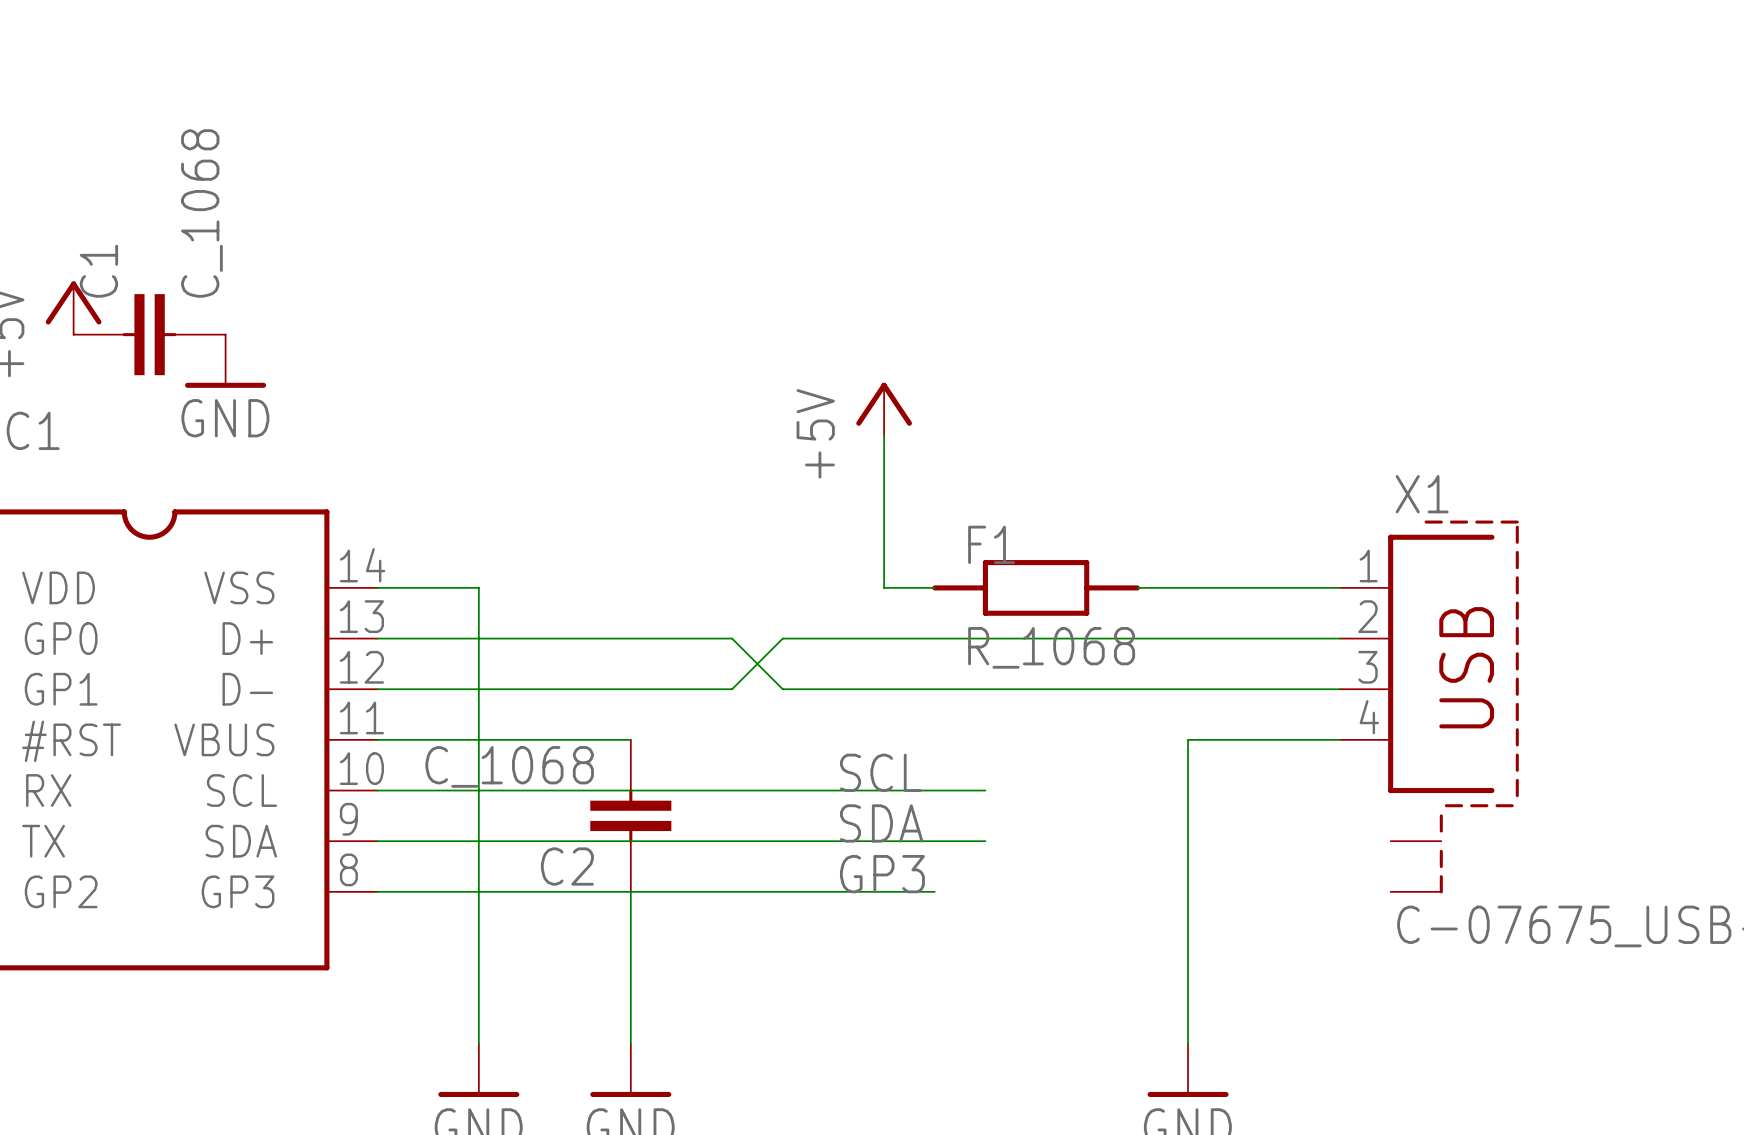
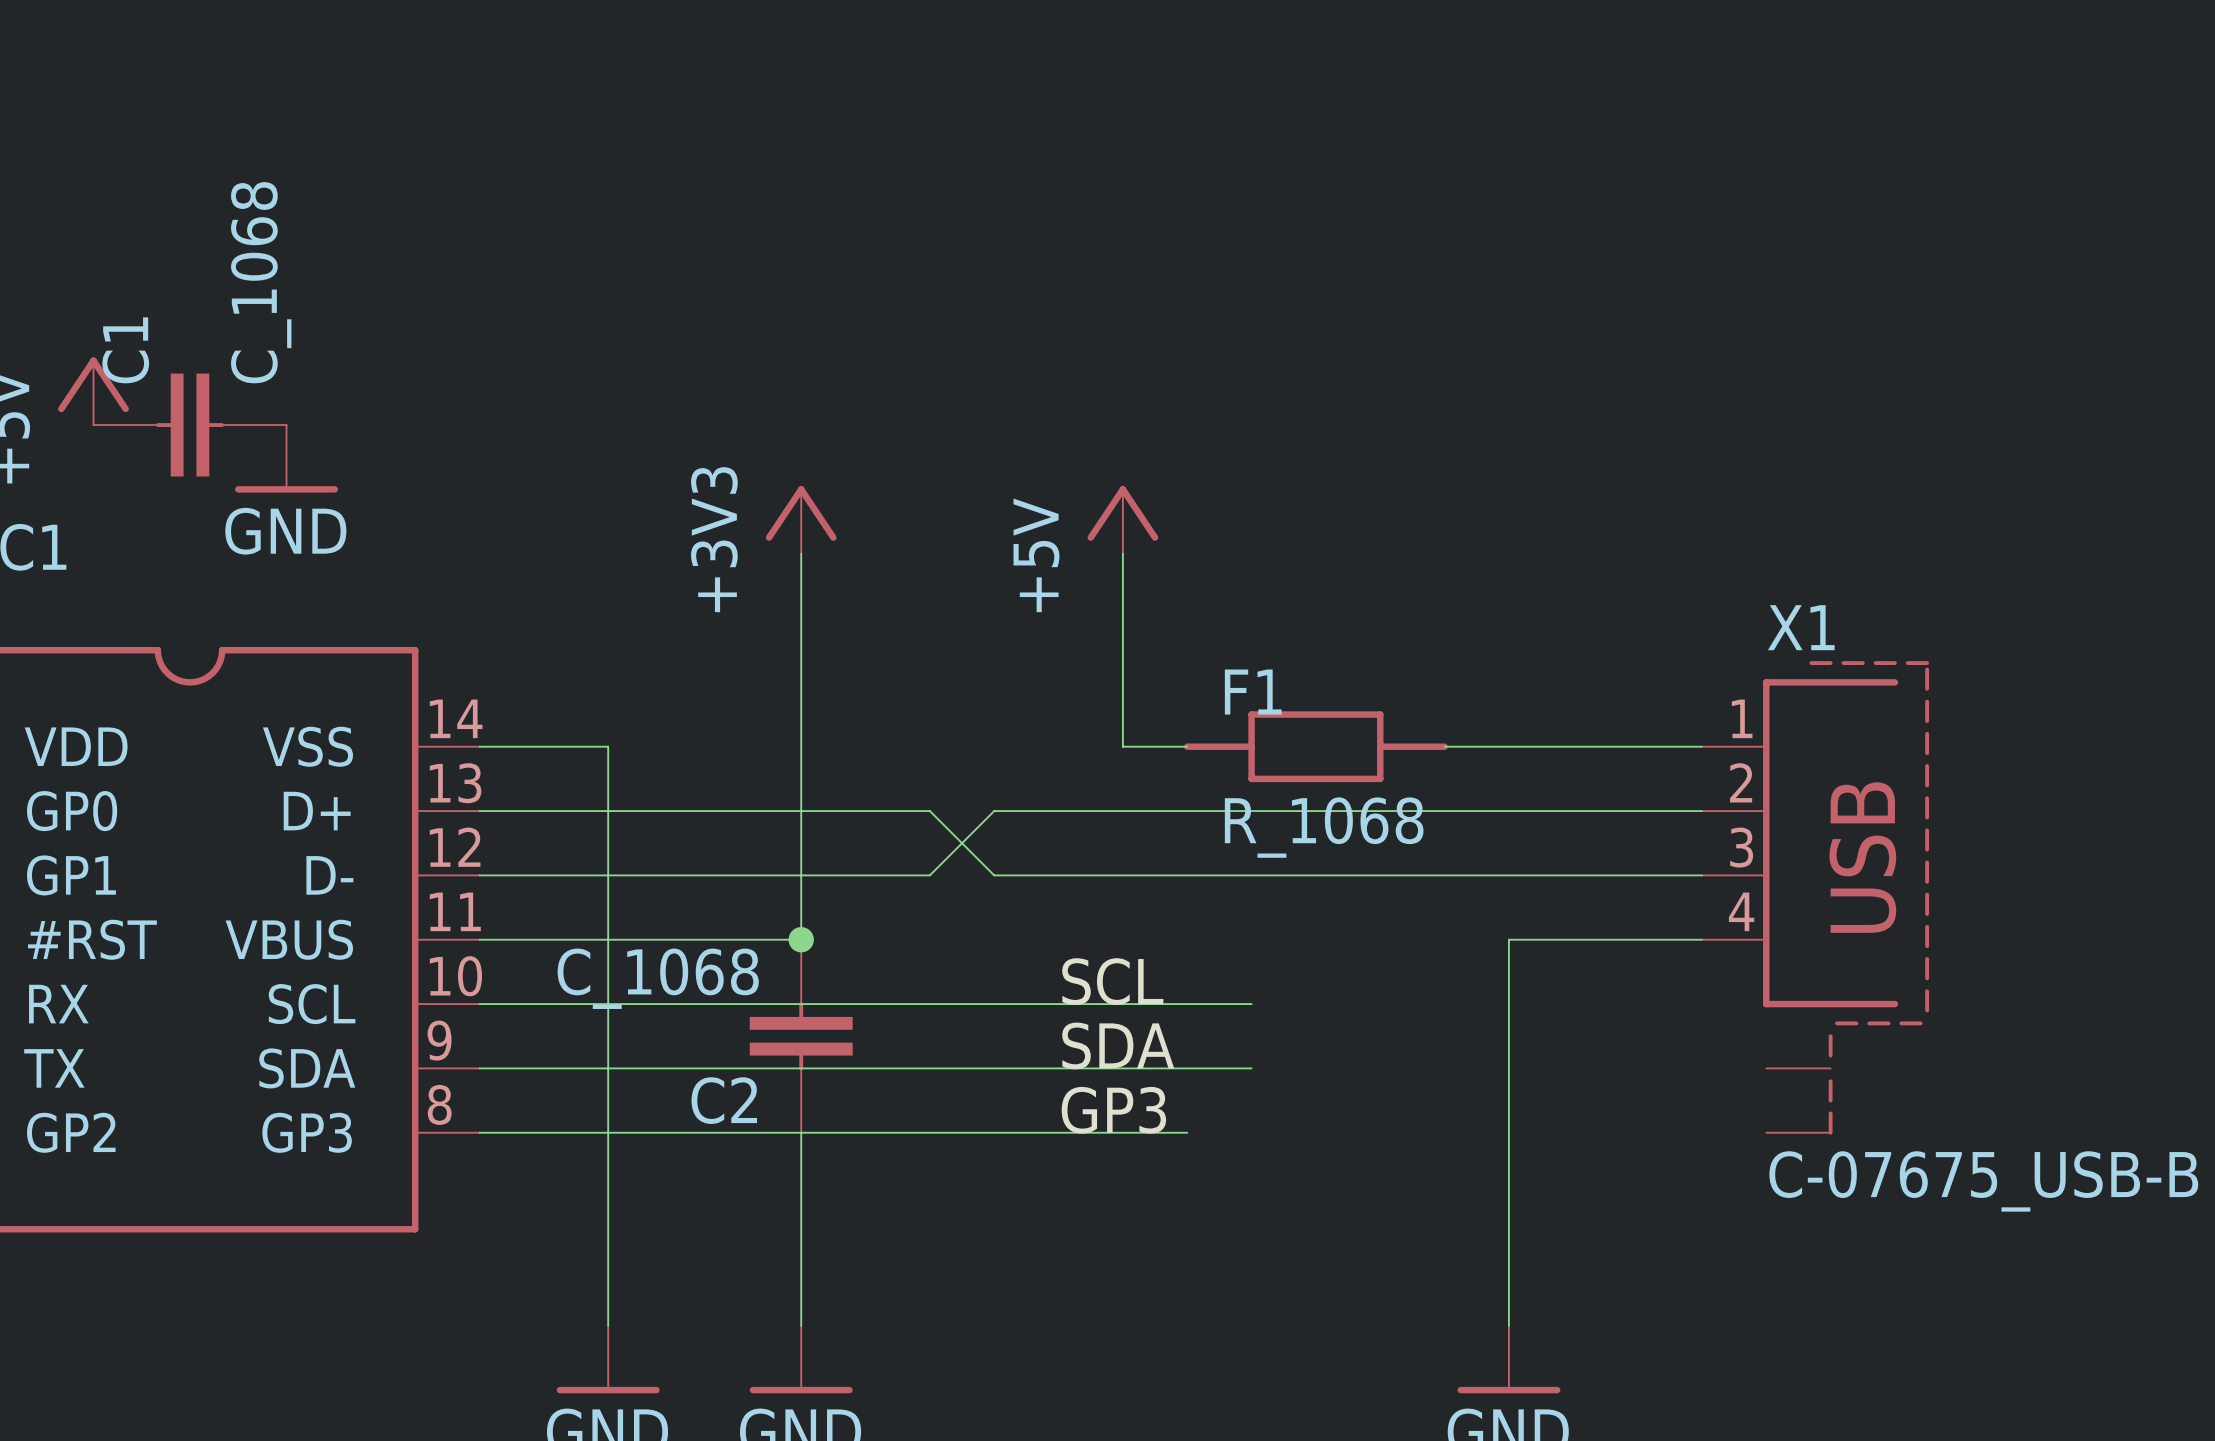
power symbol: none -> +3V3 (801, 519)
wire: none -> (801, 553) (801, 939)
junction: none -> (801, 939)

